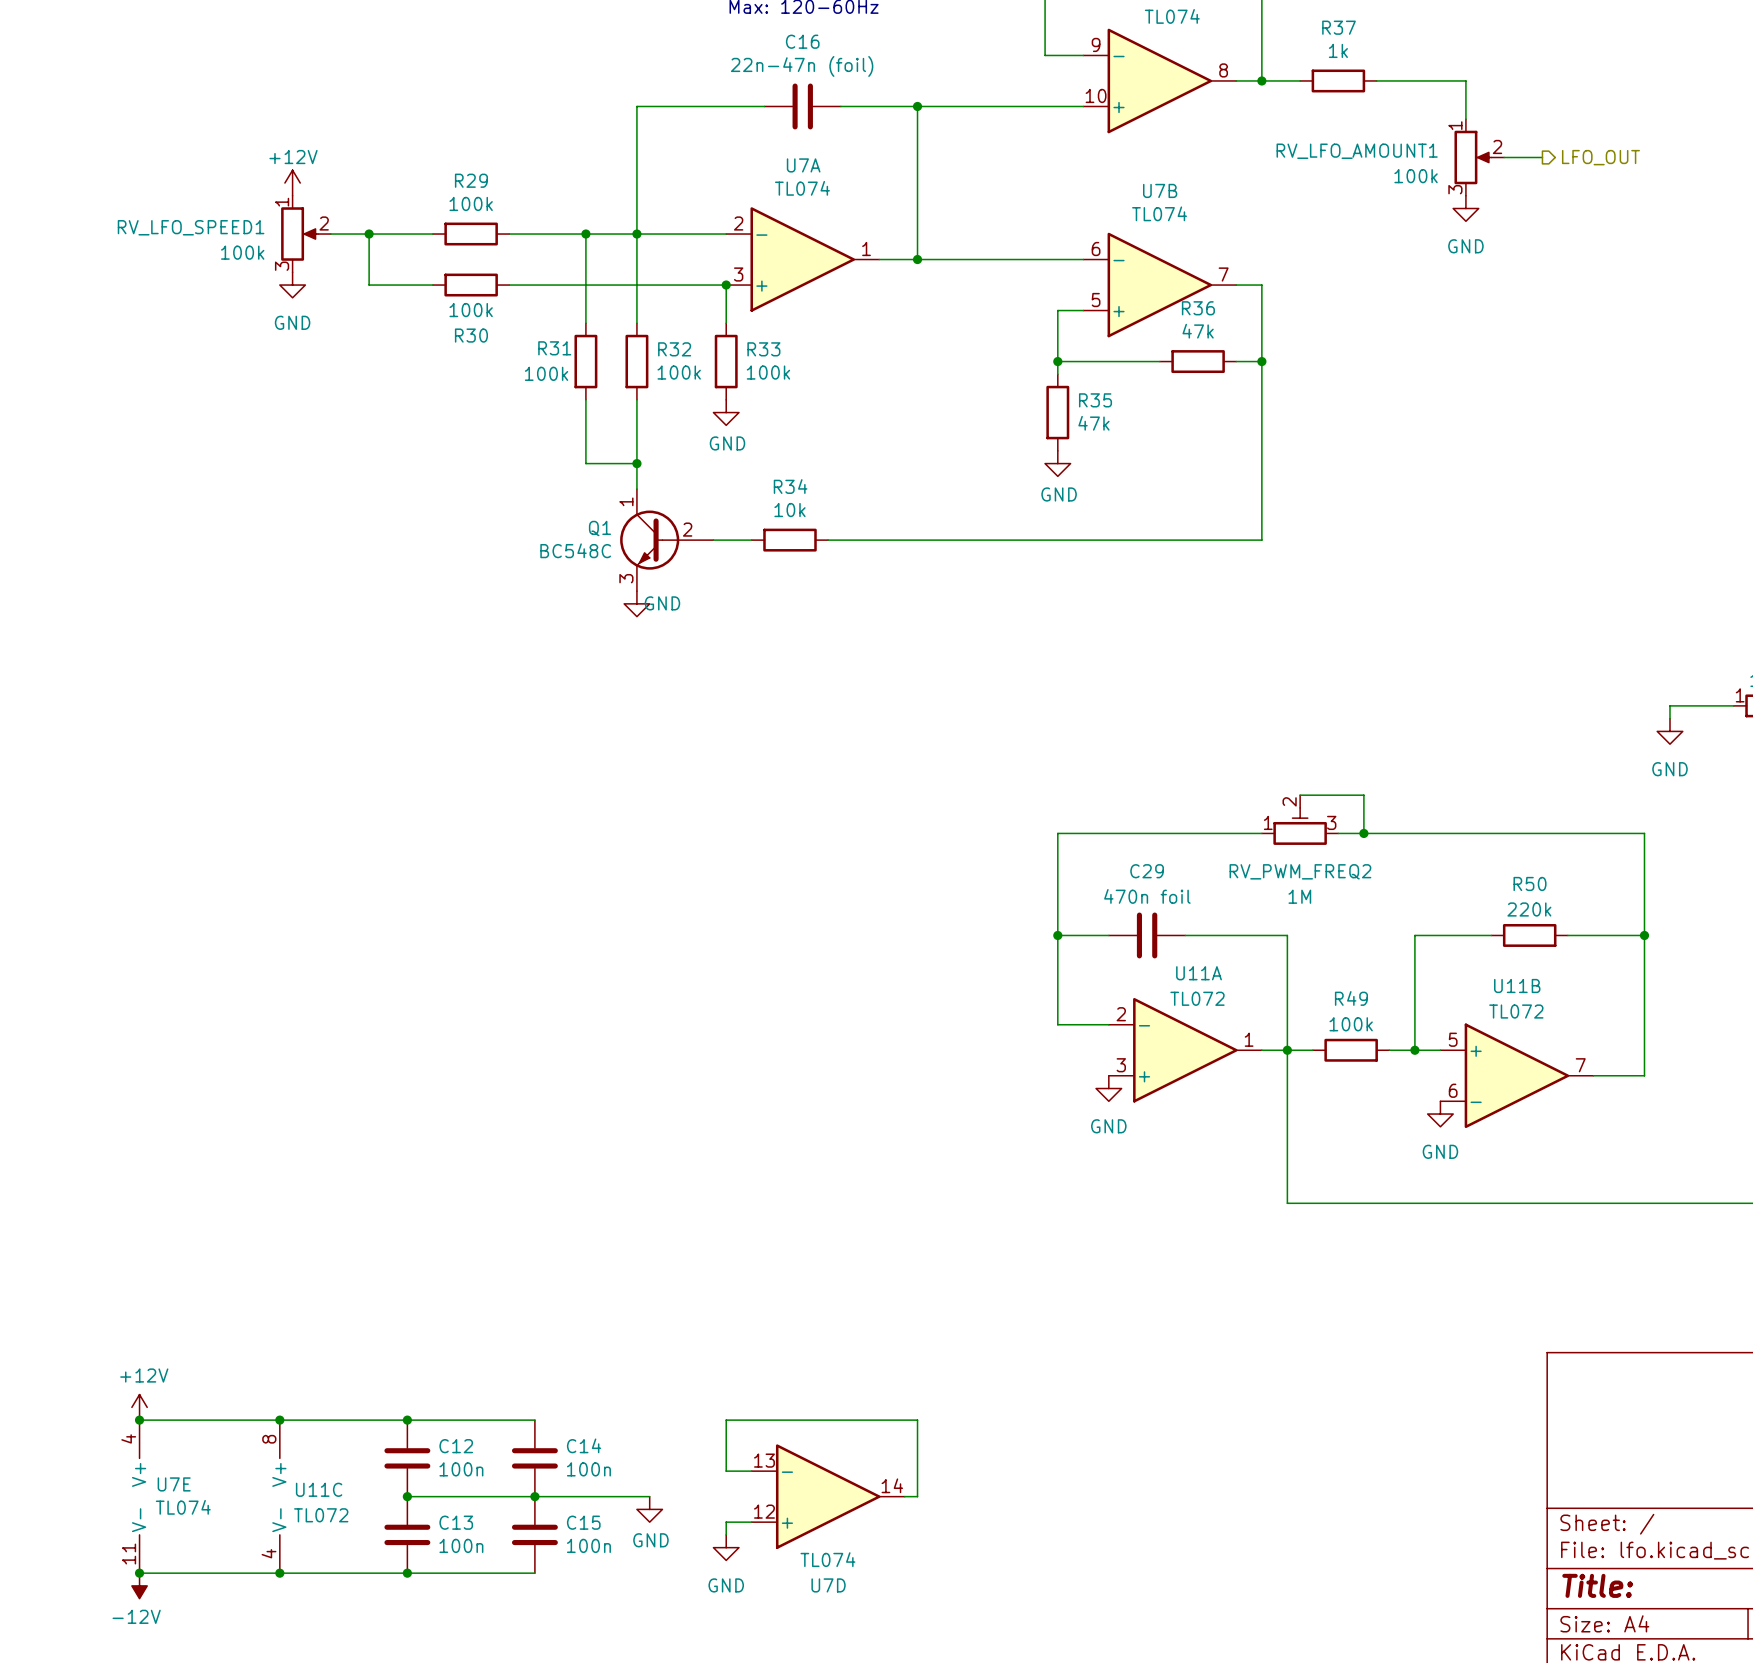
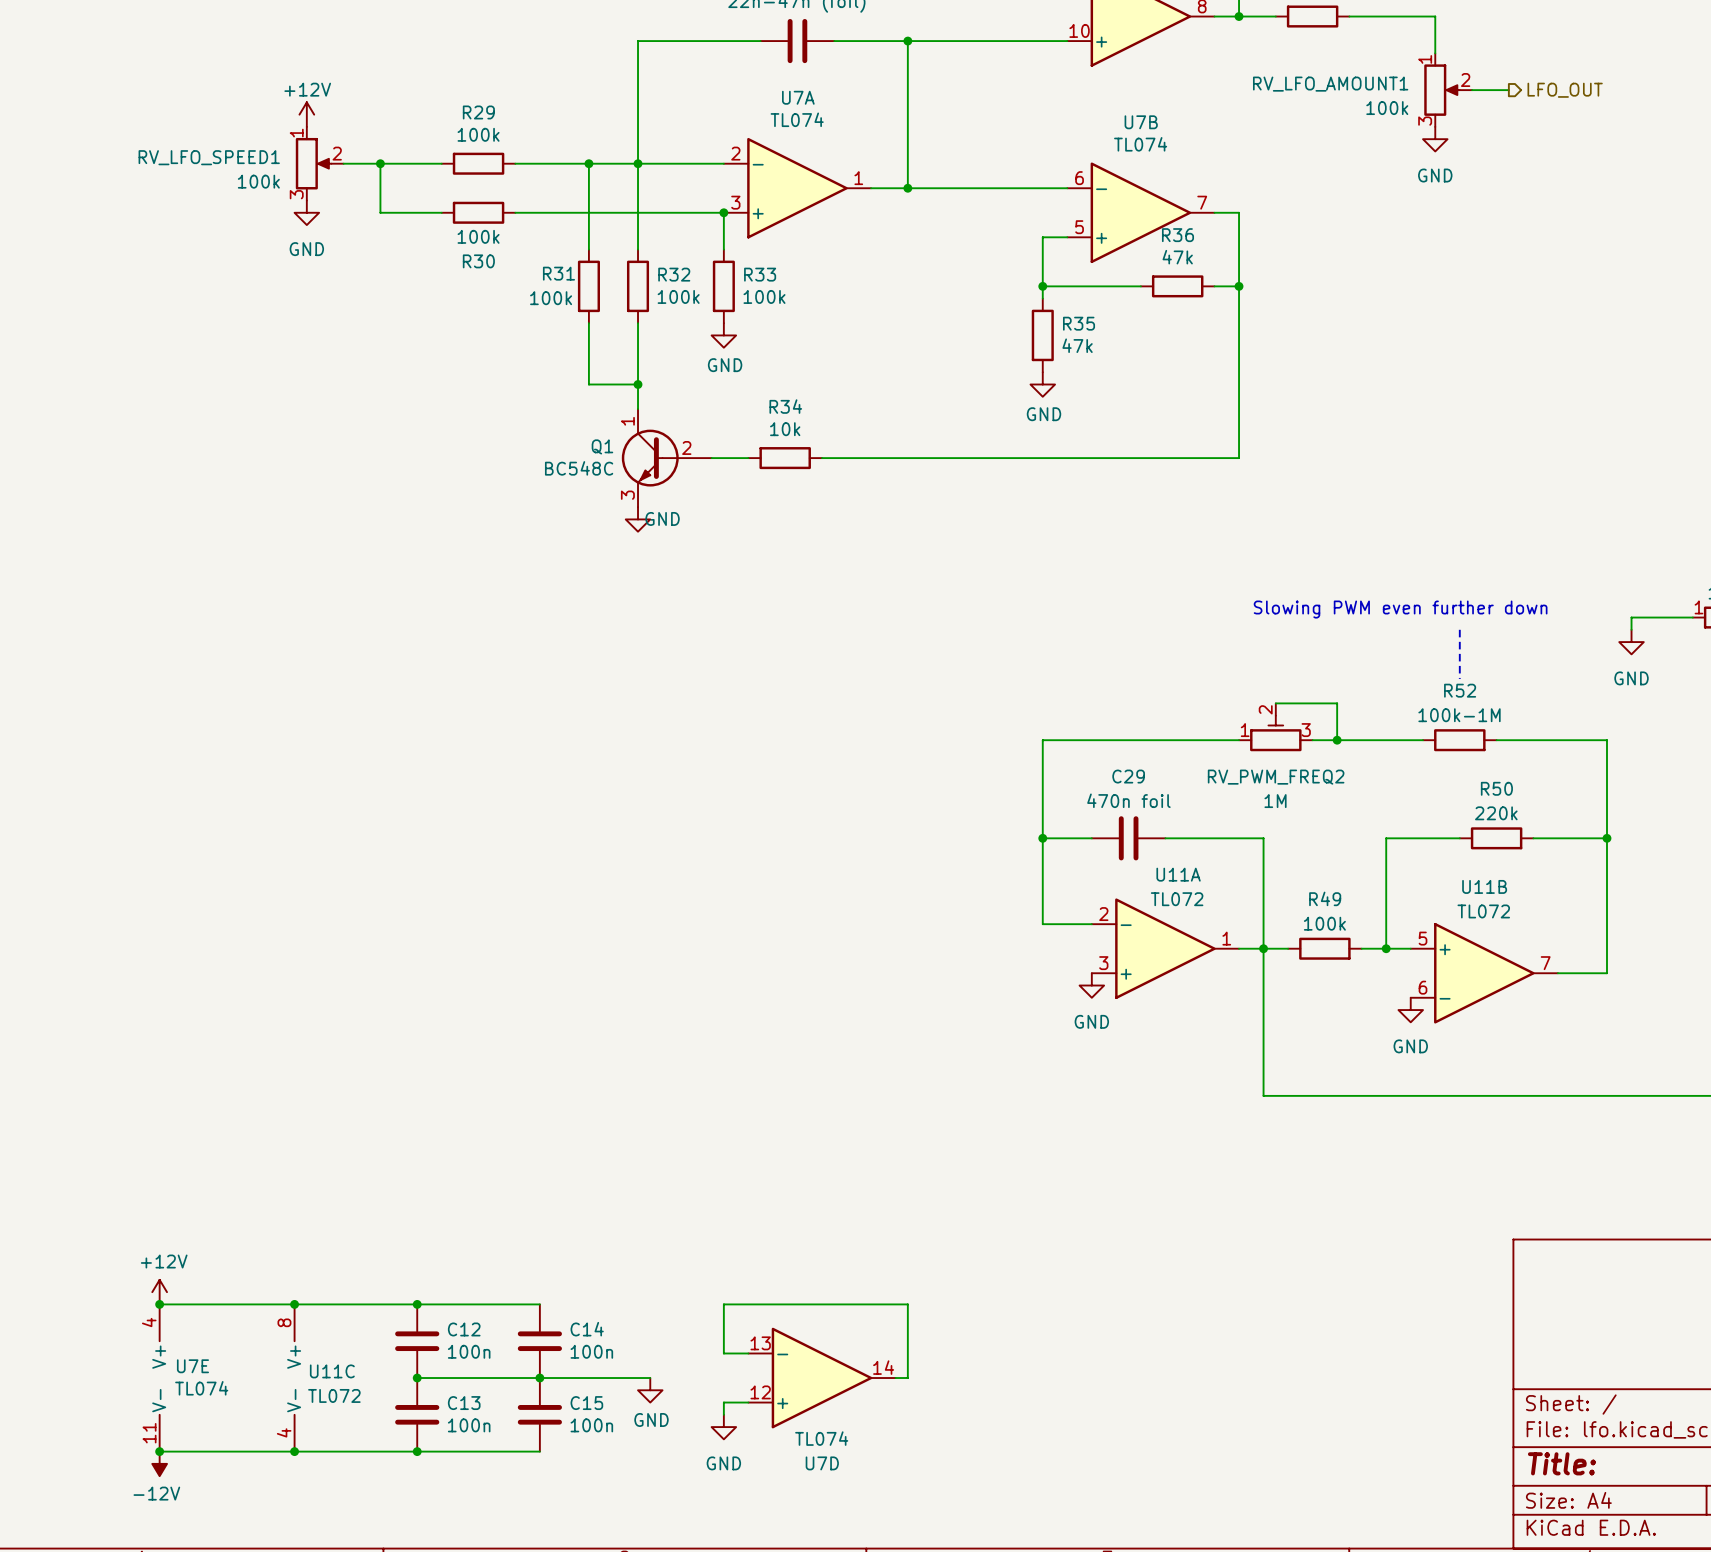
text: none -> Slowing PWM even further down (1400, 609)
line: none -> (1459, 629) (1459, 678)
wire: (1453, 833) (1529, 833) -> none
R52: none -> 100k-1M (1459, 740)

